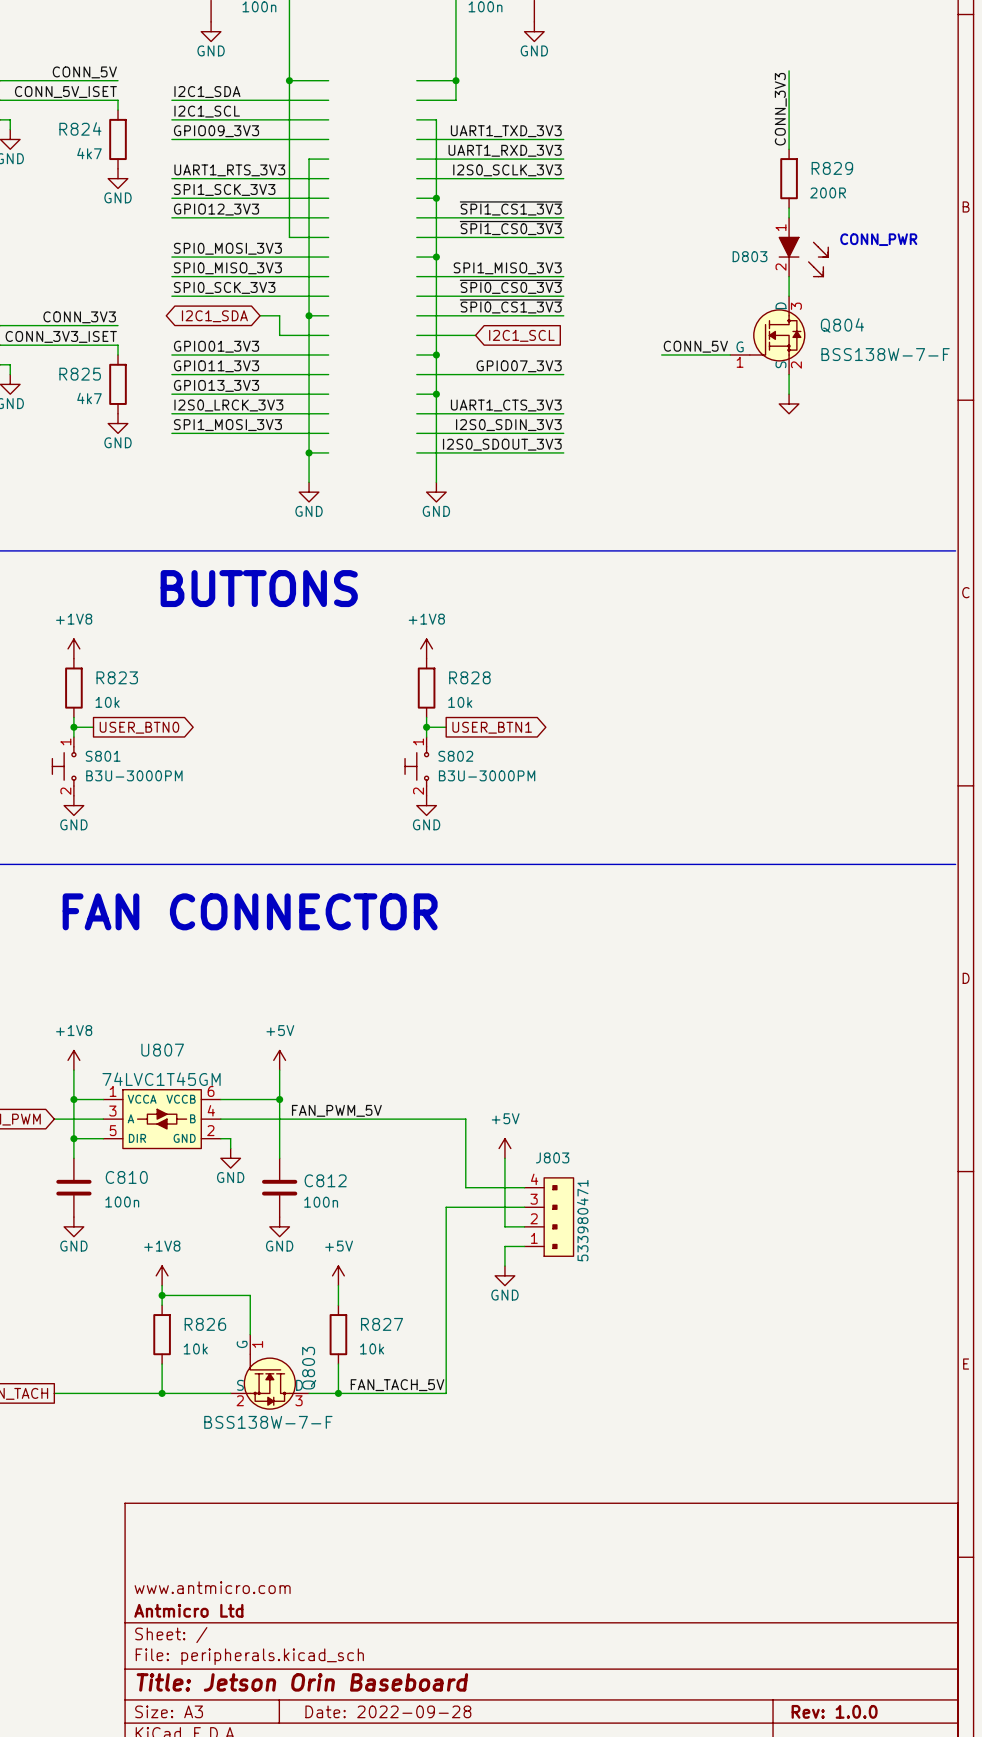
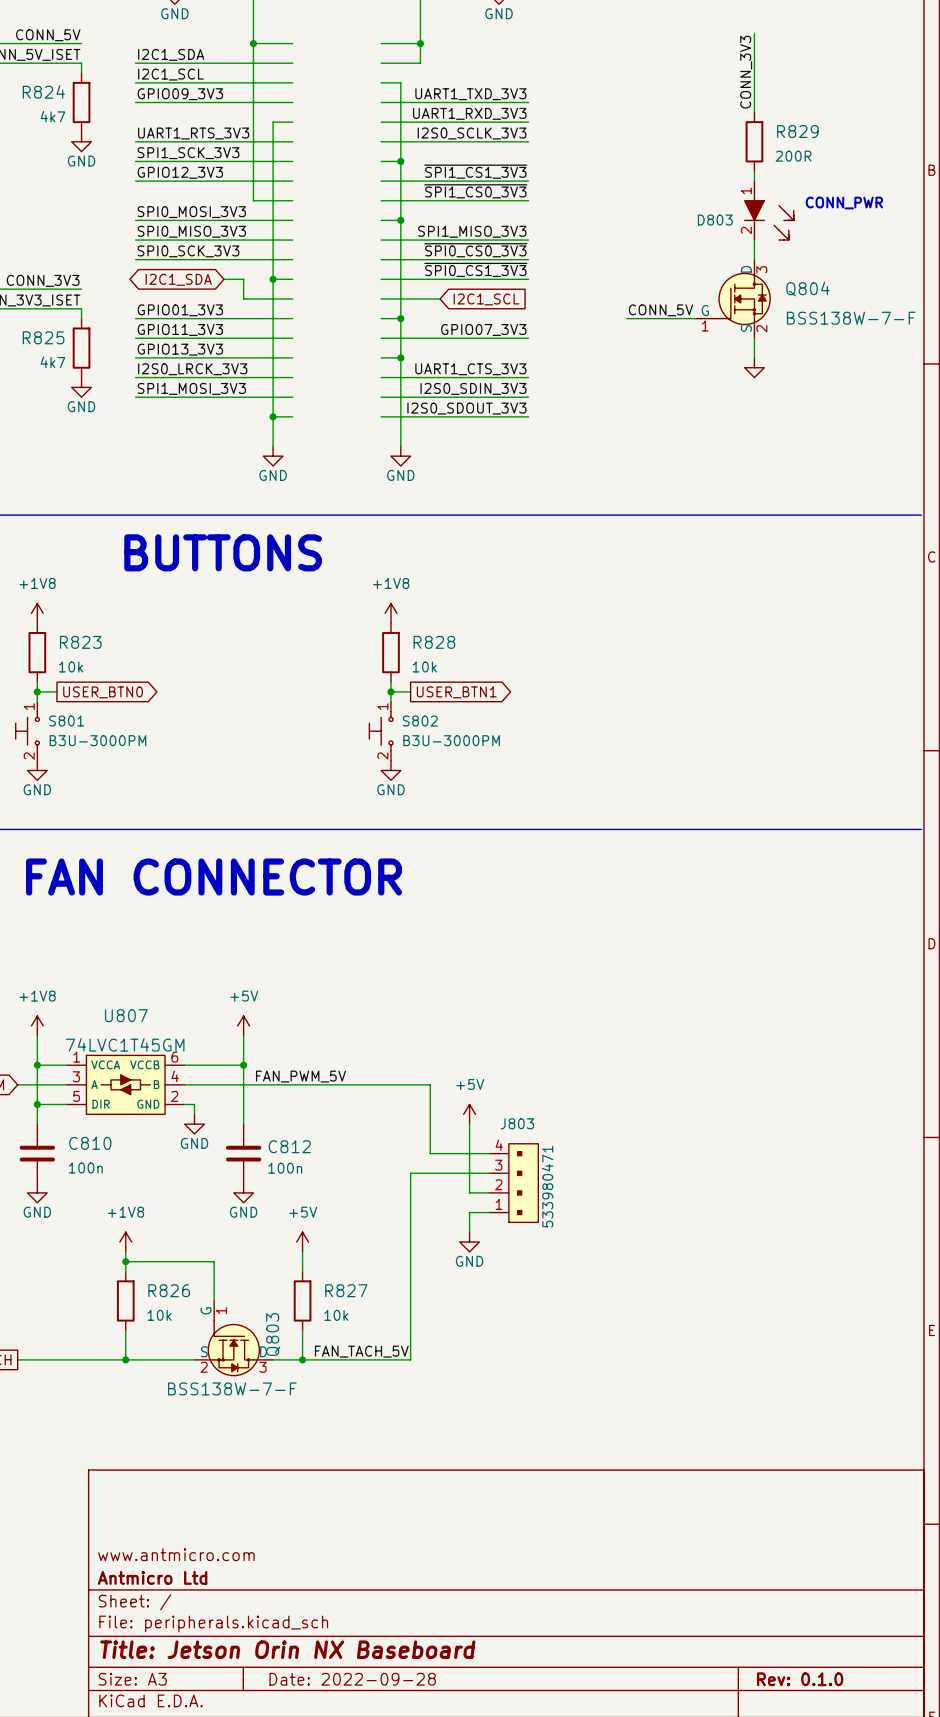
title block: Title: Jetson Orin Baseboard (302, 1682) -> Title: Jetson Orin NX Baseboard (287, 1649)
title block: Rev: 1.0.0 (834, 1711) -> Rev: 0.1.0 (800, 1679)

